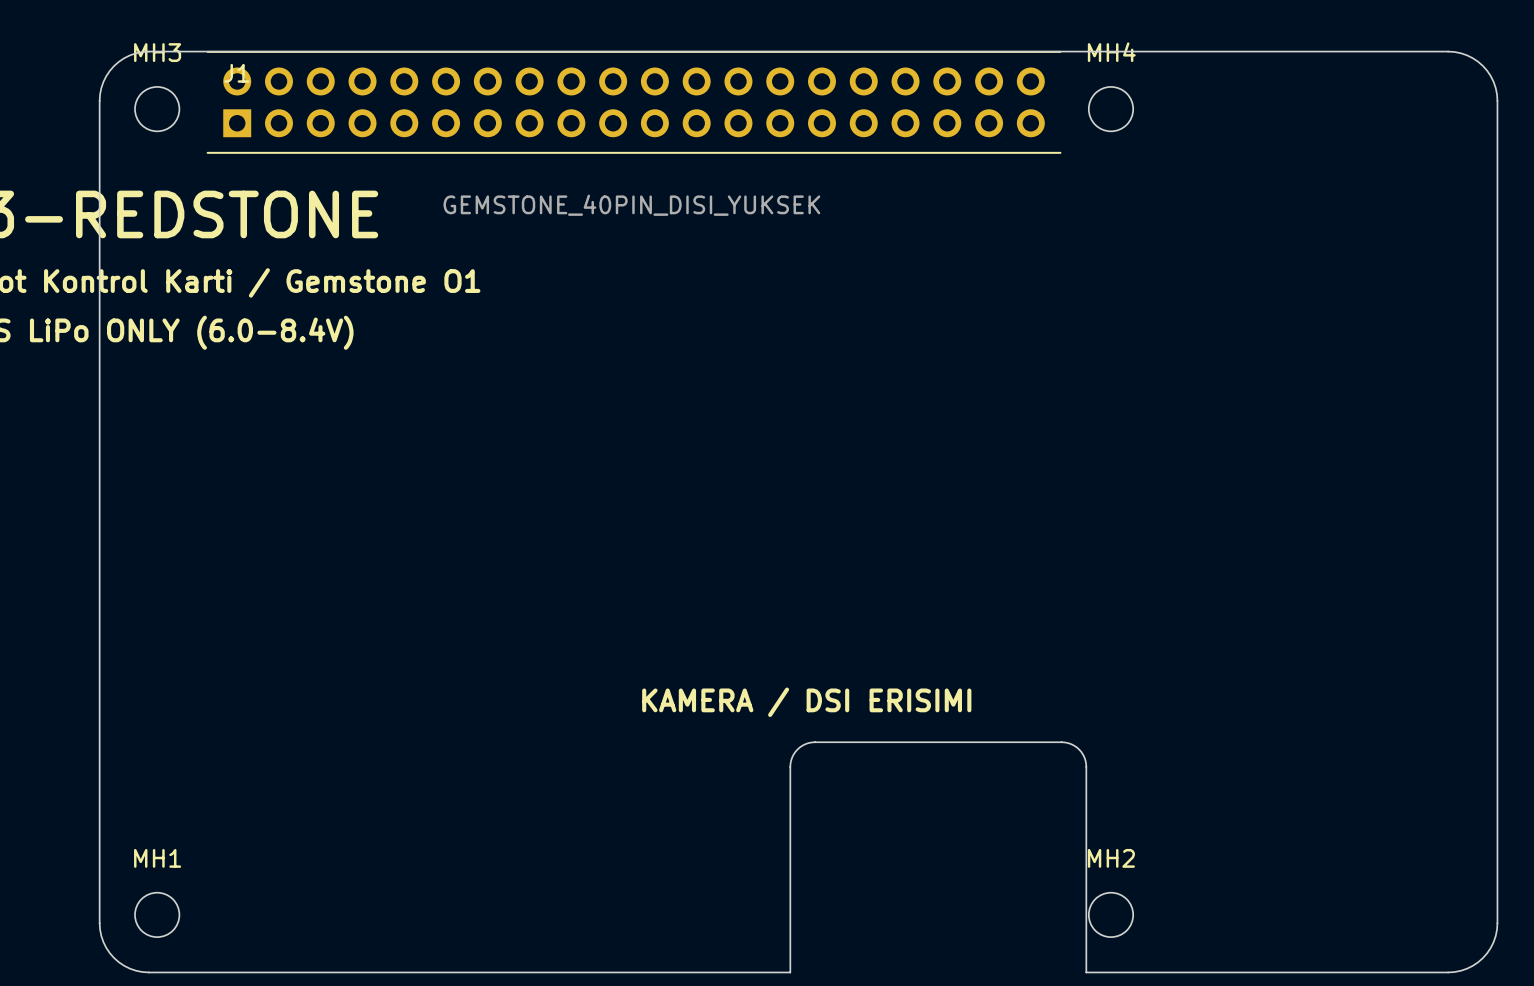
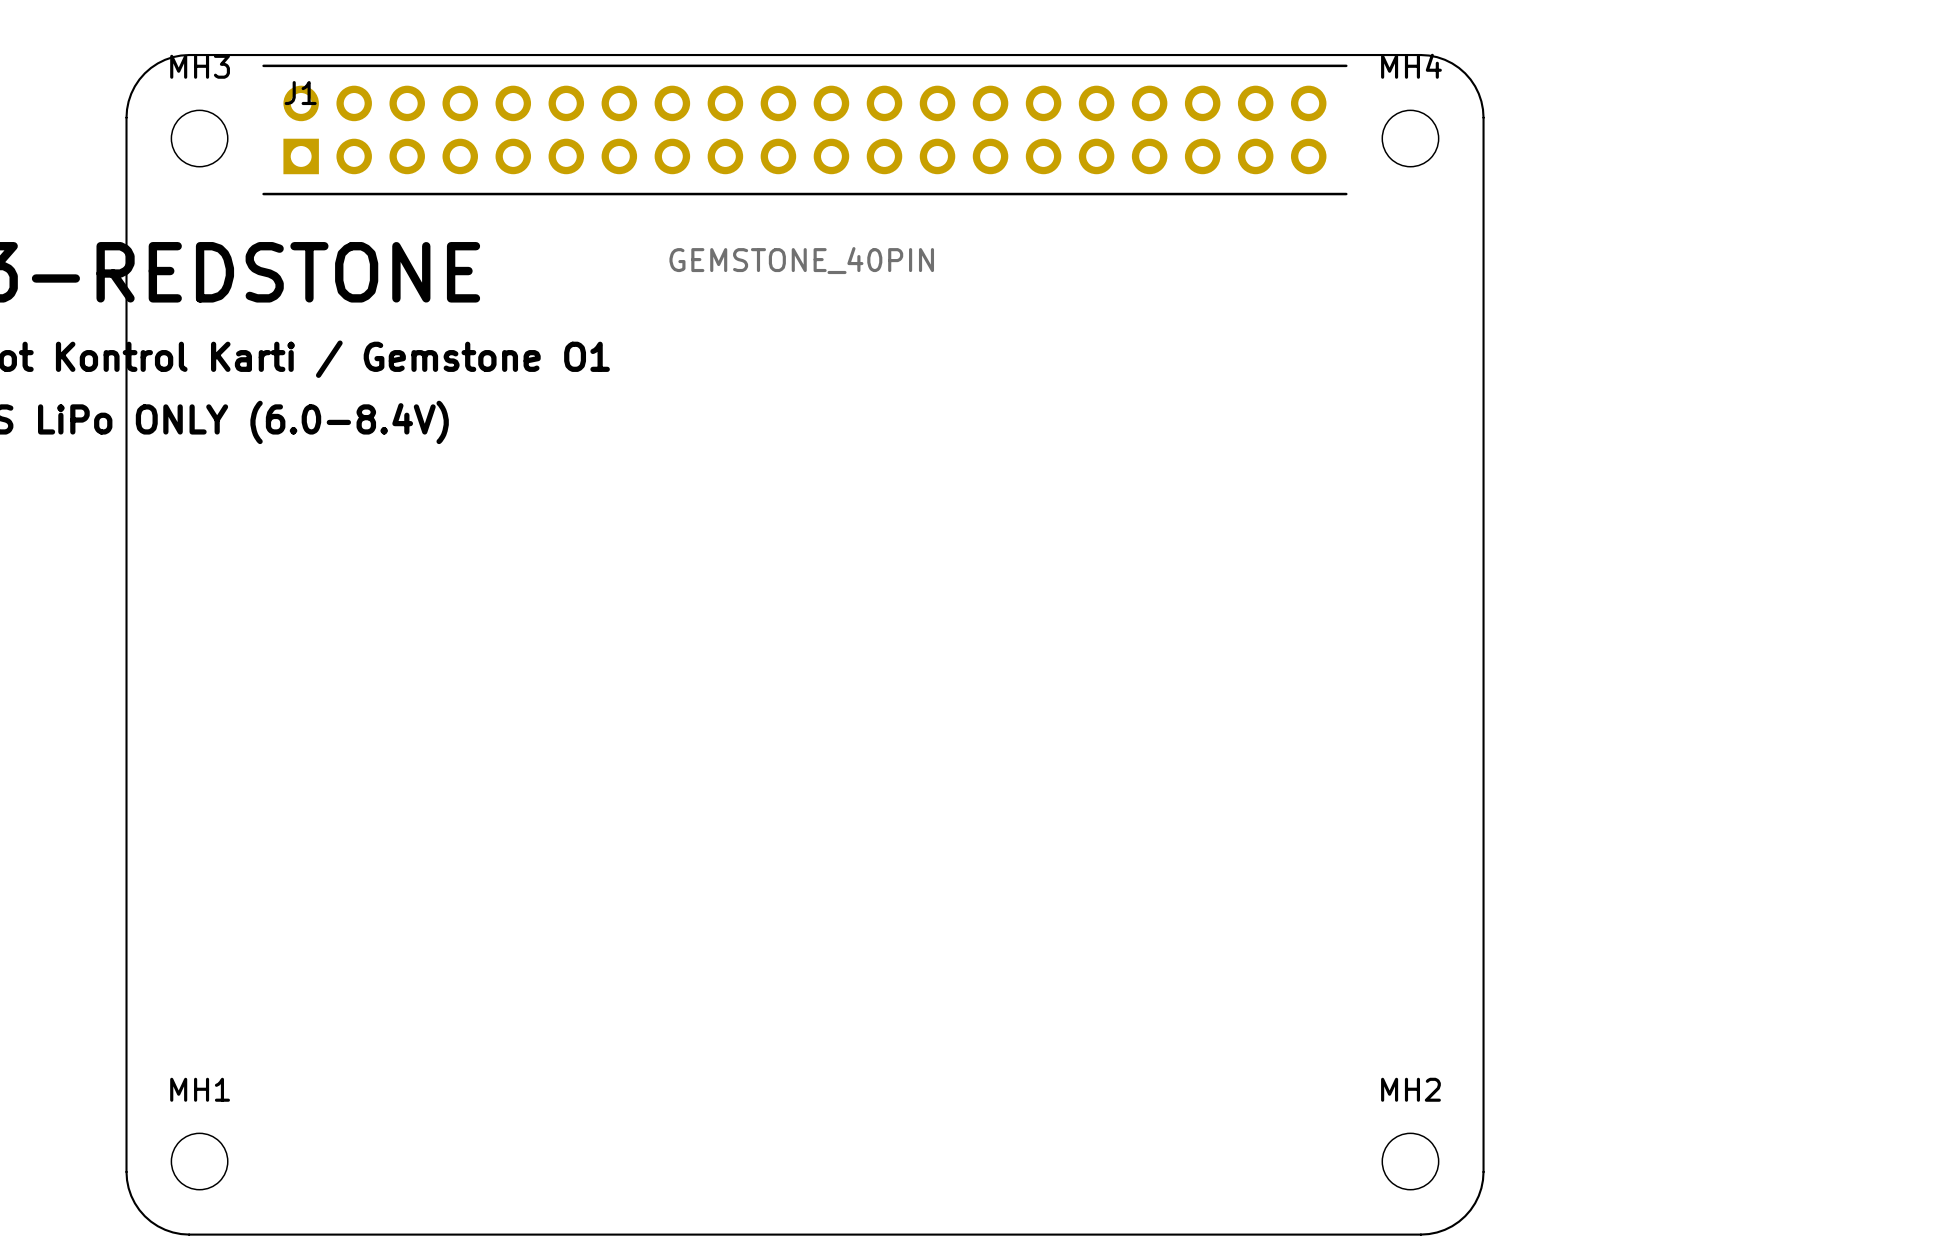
board edge: (99, 100) (103, 82) (114, 66) (130, 55) (148, 51) (1448, 51) (1460, 53) (1478, 61) (1490, 76) (1495, 88) (1497, 100) (1497, 923) (1493, 942) (1487, 953) (1478, 962) (1466, 968) (1454, 972) (1119, 972) -> (126, 128) (128, 101) (139, 79) (151, 67) (165, 59) (189, 55) (1420, 55) (1444, 59) (1459, 67) (1470, 79) (1478, 93) (1483, 117) (1483, 1171) (1478, 1195) (1465, 1216) (1444, 1229) (1420, 1234)
J1 value: GEMSTONE_40PIN_DISI_YUKSEK (631, 205) -> GEMSTONE_40PIN (801, 260)
text: KAMERA / DSI ERISIMI (806, 702) -> none
board edge: (790, 972) (790, 764) (792, 756) (799, 747) (814, 742) (1061, 742) (1077, 747) (1083, 756) (1086, 766) (1086, 972) -> (1003, 1234) (1379, 1234)

